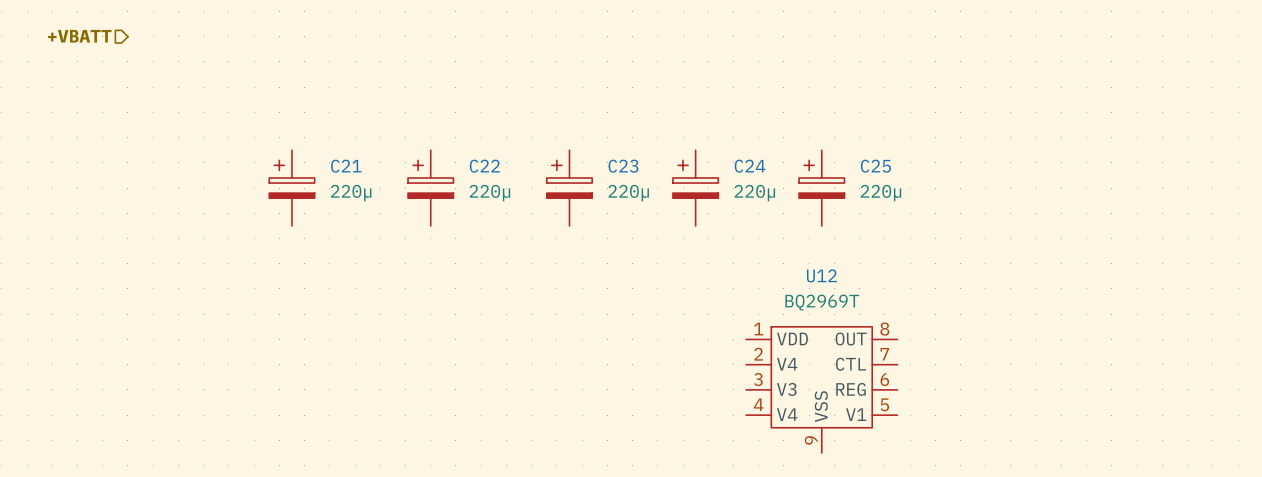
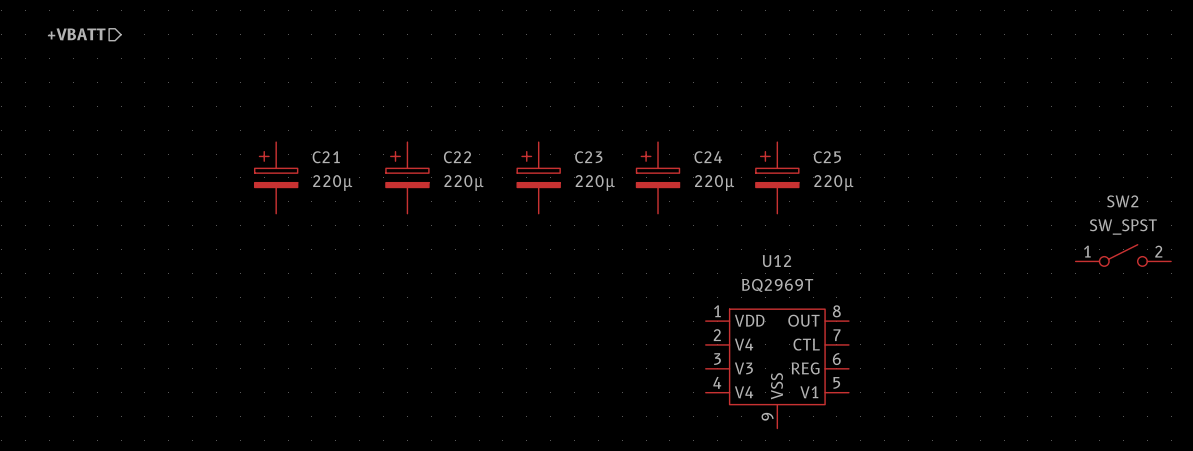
SW2: none -> SW_SPST (1123, 255)

